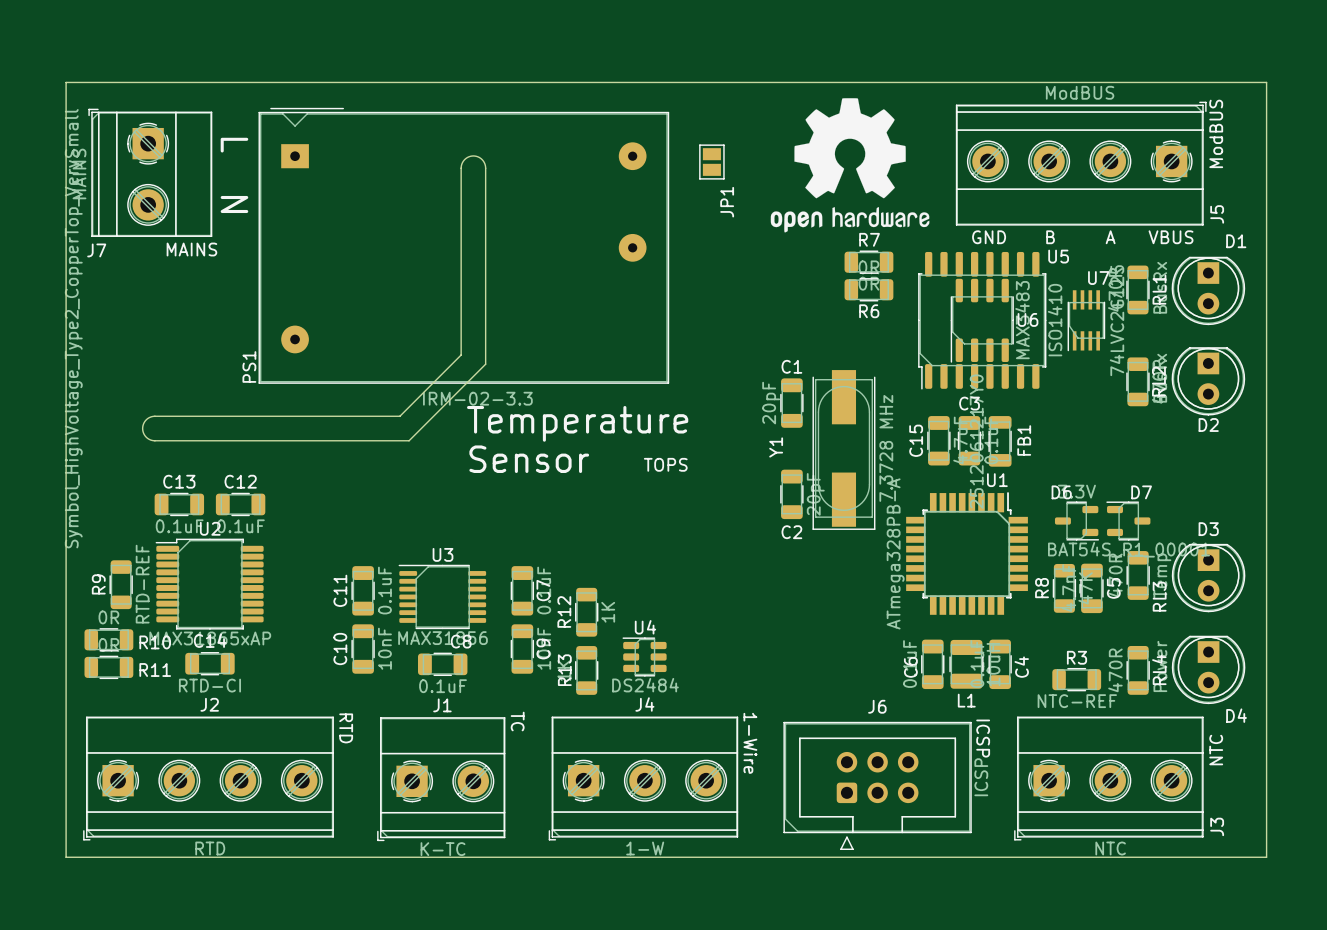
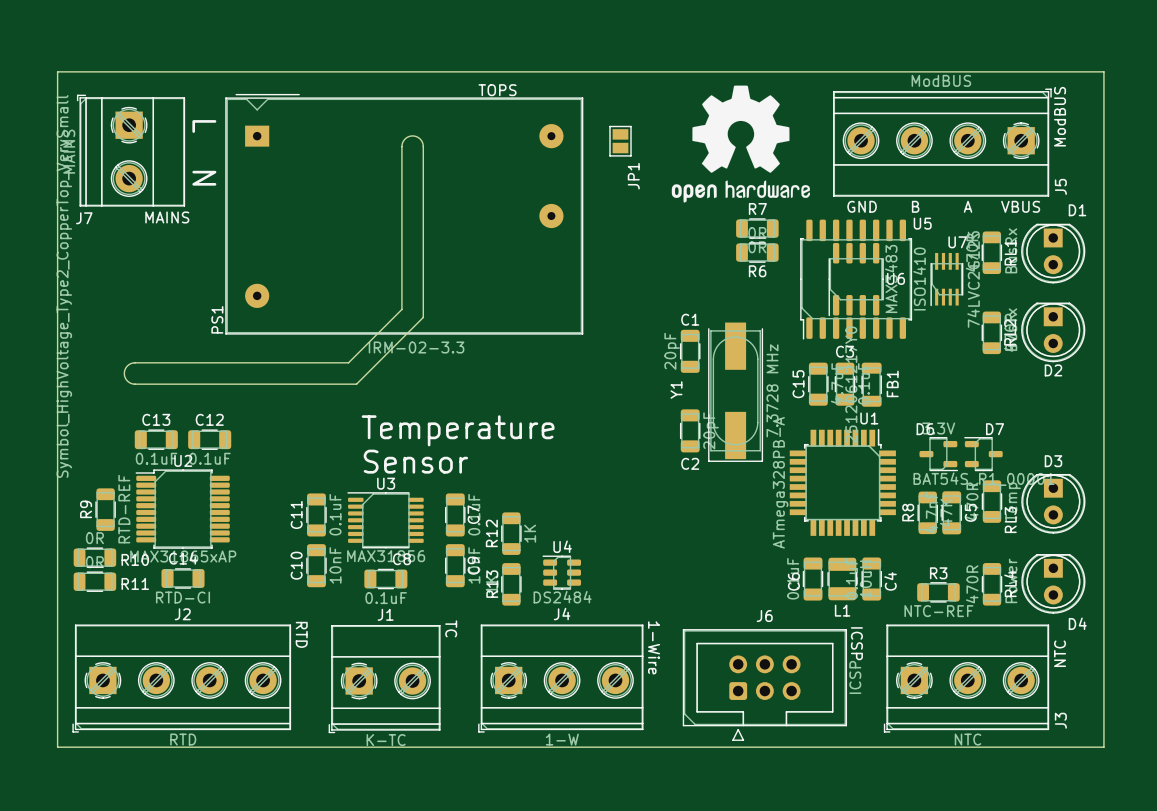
text: none -> TOPS (497, 90)
text position: Temperature (577, 423) -> Temperature (458, 430)
text position: Sensor (529, 459) -> Sensor (415, 461)
text: TOPS (665, 464) -> none

